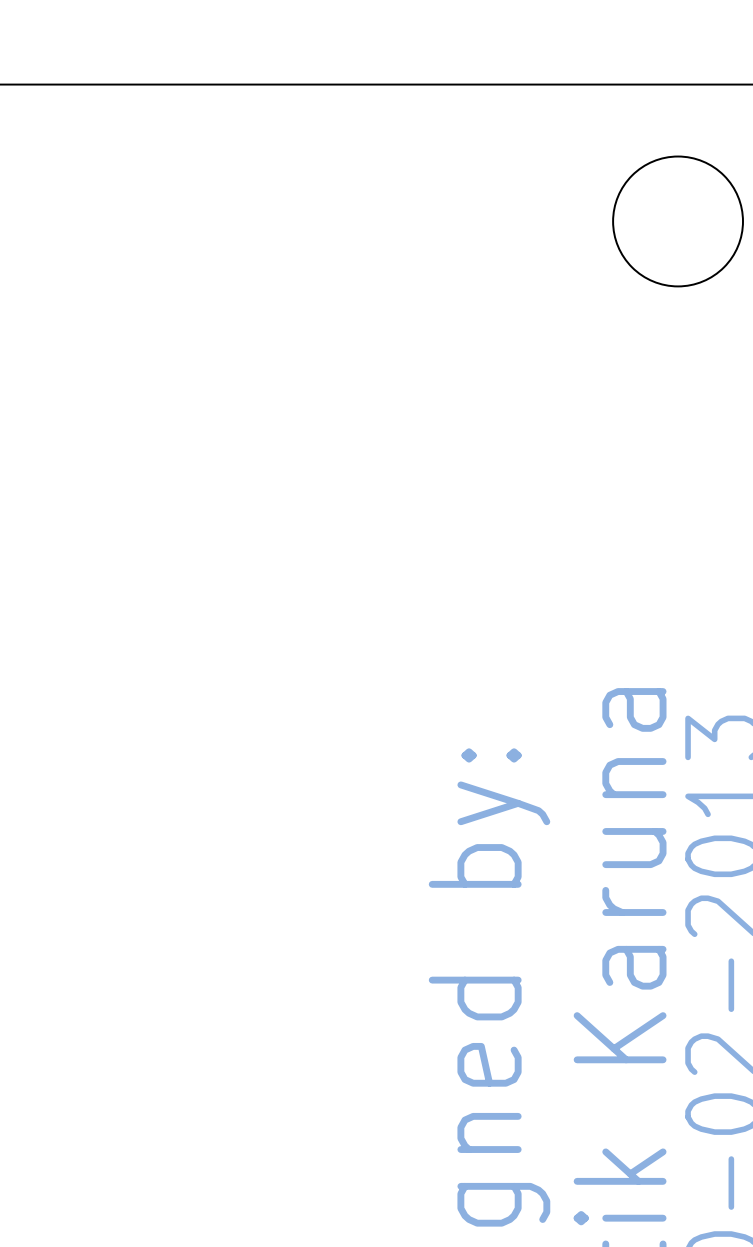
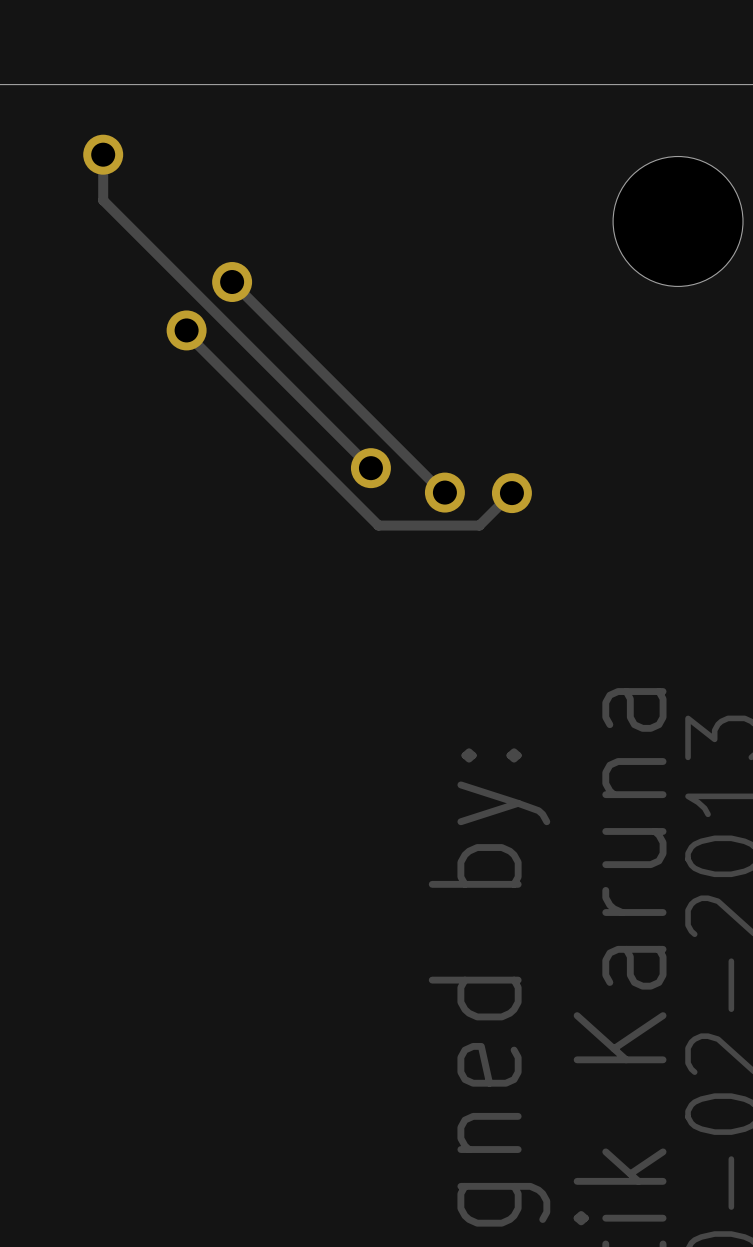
track: none -> (103, 154) (103, 200) (370, 468)
via: none -> (103, 154)
track: none -> (232, 282) (442, 492) (444, 492)
via: none -> (232, 282)
track: none -> (186, 330) (186, 333) (378, 525) (479, 525) (511, 493)
via: none -> (186, 330)
via: none -> (370, 468)
via: none -> (444, 492)
via: none -> (511, 493)

